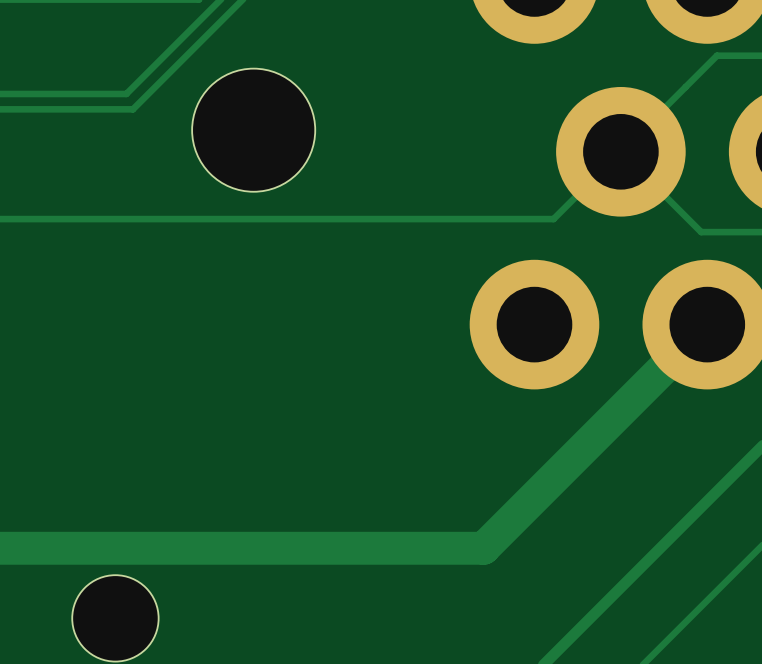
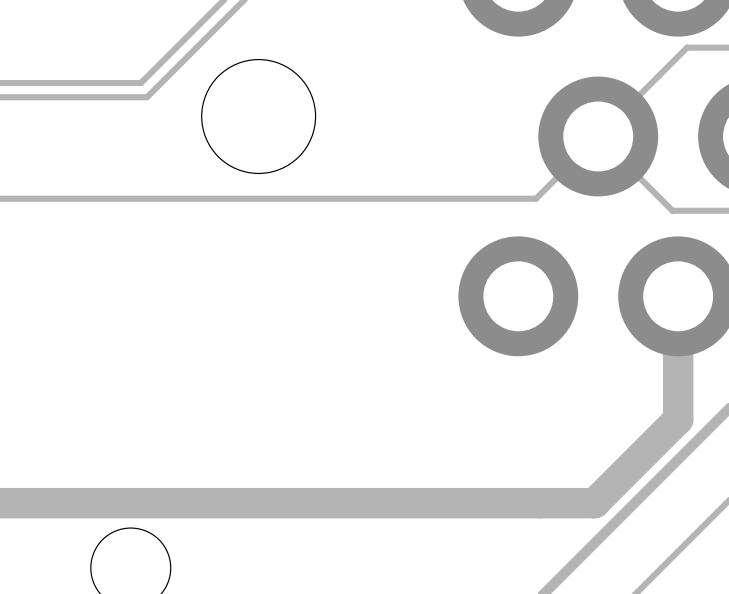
track: (707, 324) (483, 548) -> (678, 296) (678, 419) (594, 503) (471, 503)

